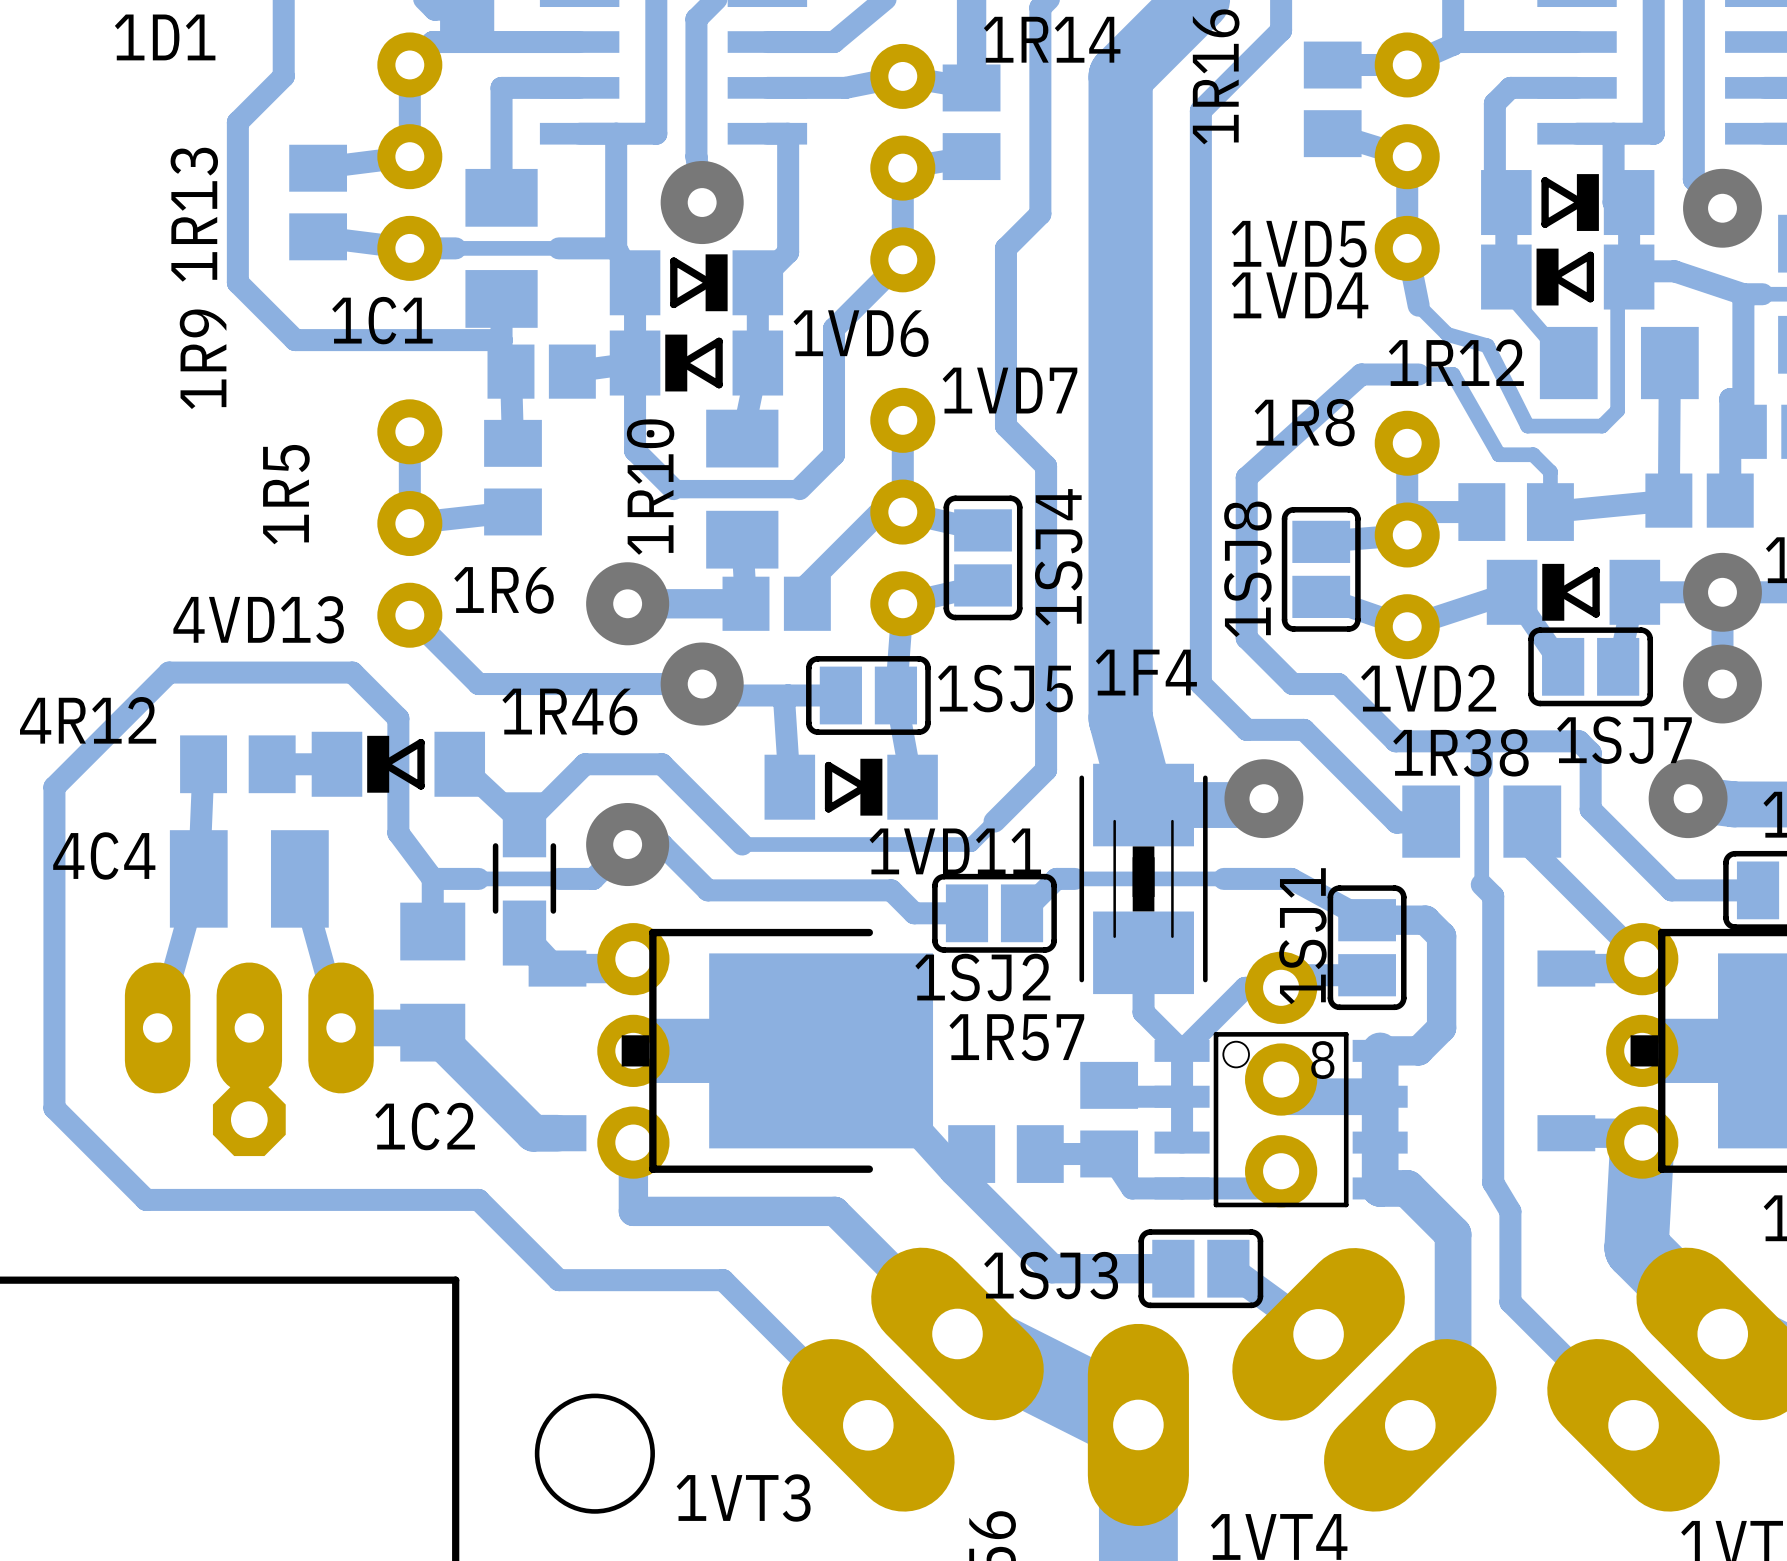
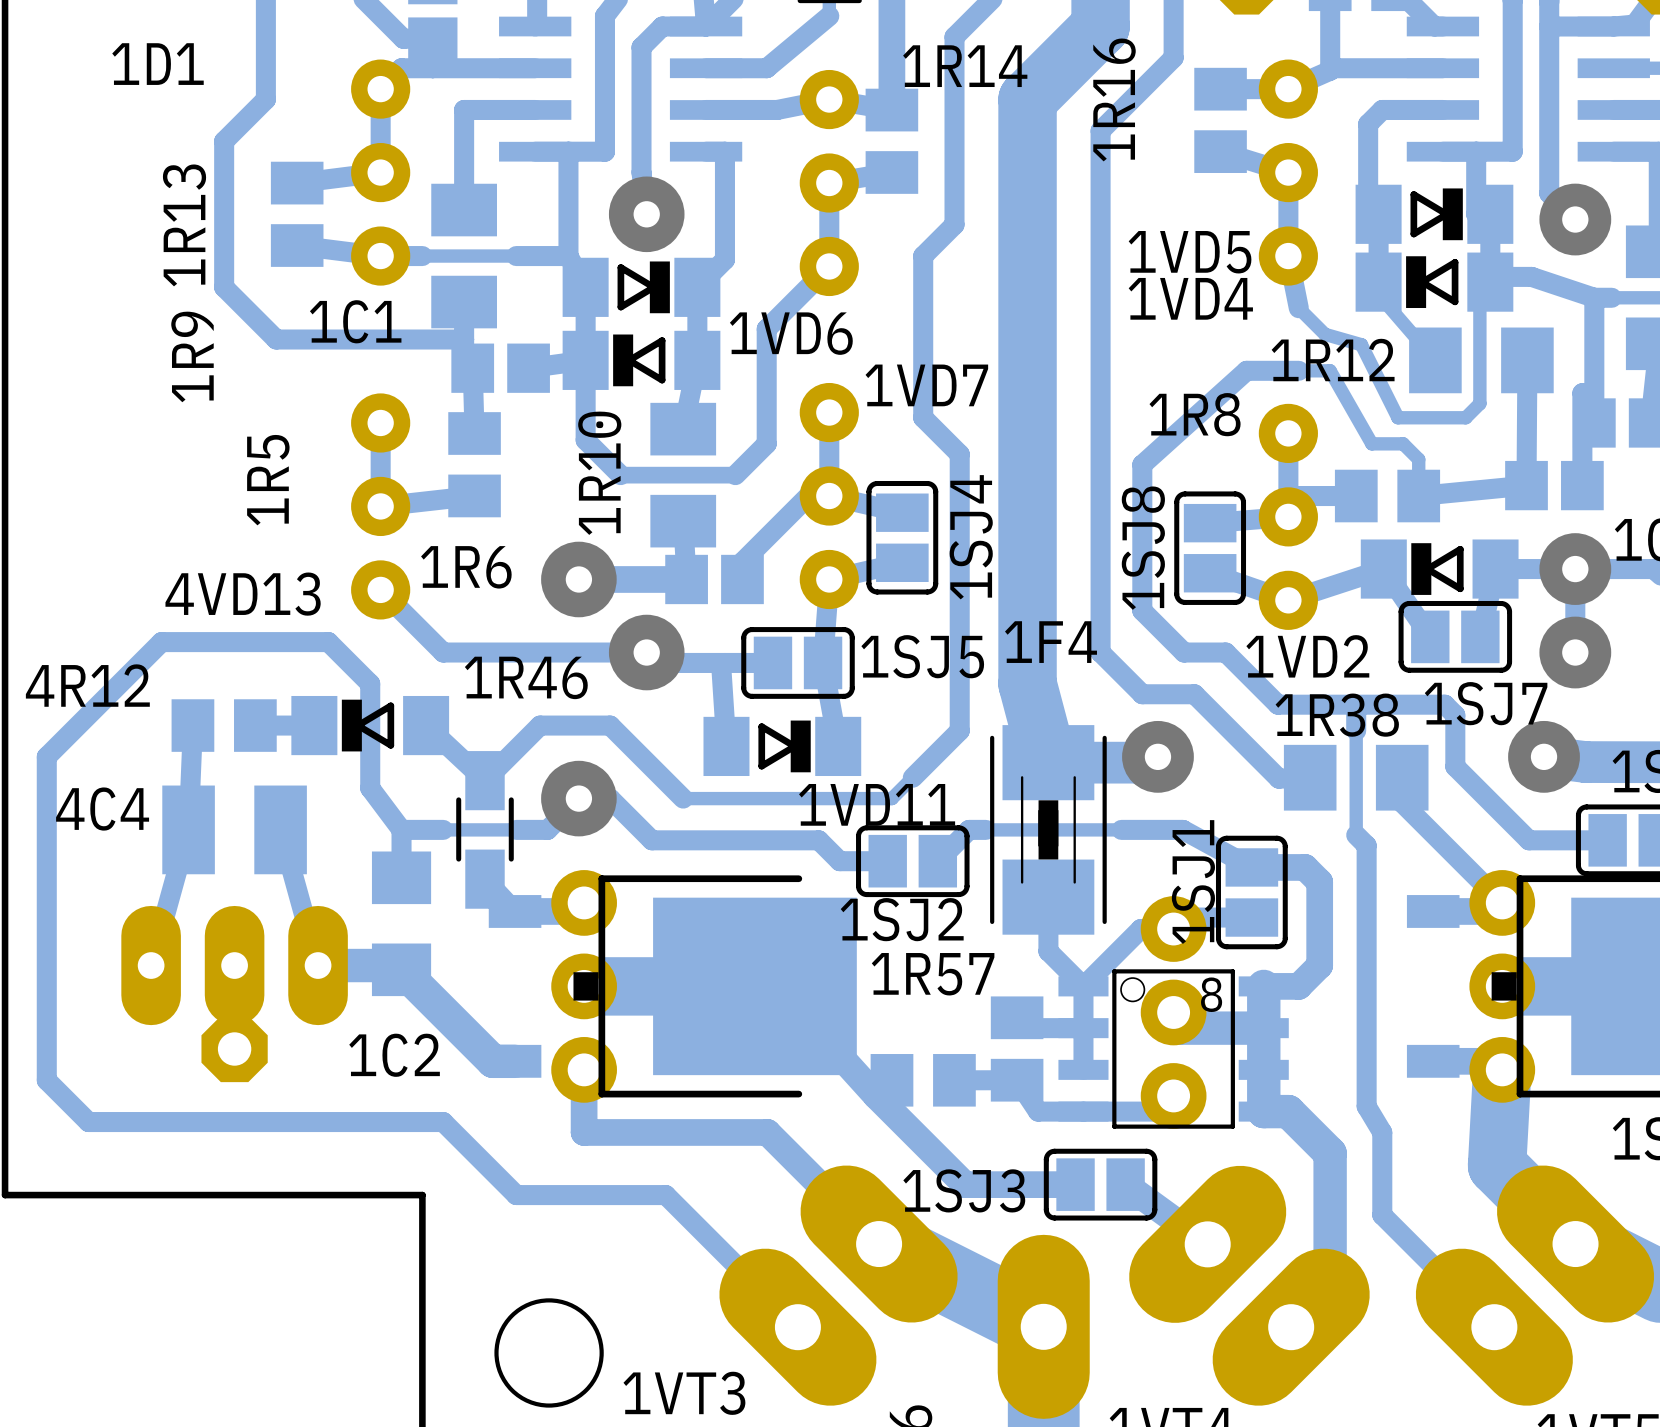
track: (54, 787) (54, 1108) (146, 1199) -> (57, 746) (46, 756) (46, 1080) (88, 1122) (140, 1122)

